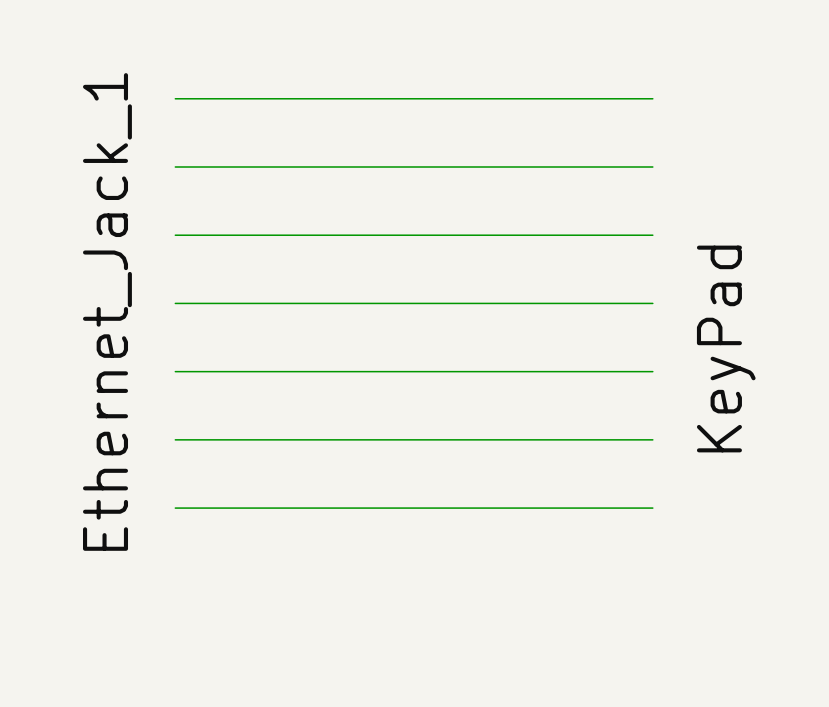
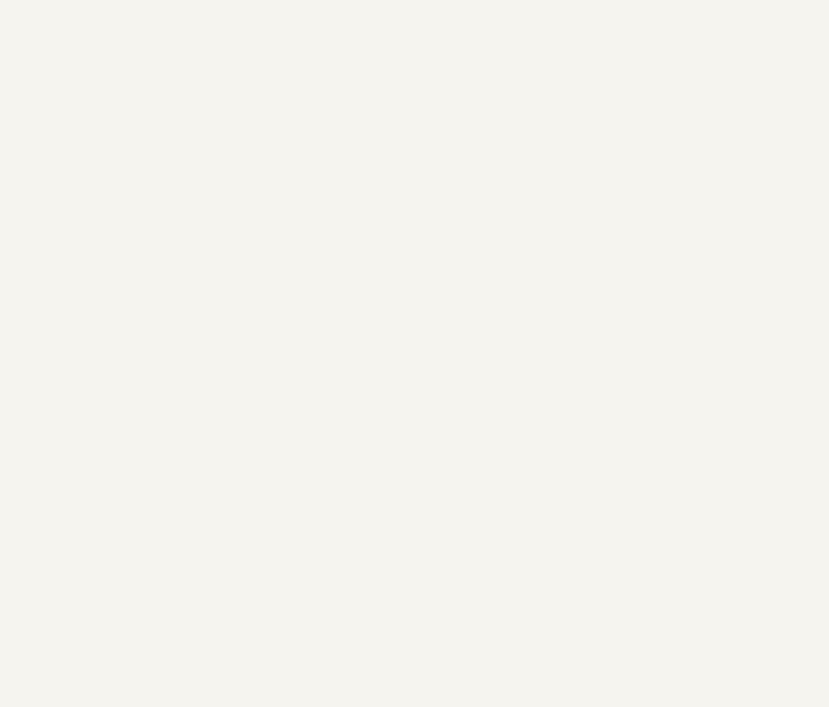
wire: (175, 98) (652, 98) -> none
wire: (175, 167) (652, 167) -> none
wire: (175, 235) (652, 235) -> none
wire: (175, 303) (652, 303) -> none
label: Ethernet_Jack_1 (107, 311) -> none
label: KeyPad (726, 348) -> none
wire: (175, 371) (652, 371) -> none
wire: (175, 439) (652, 439) -> none
wire: (175, 508) (652, 508) -> none

